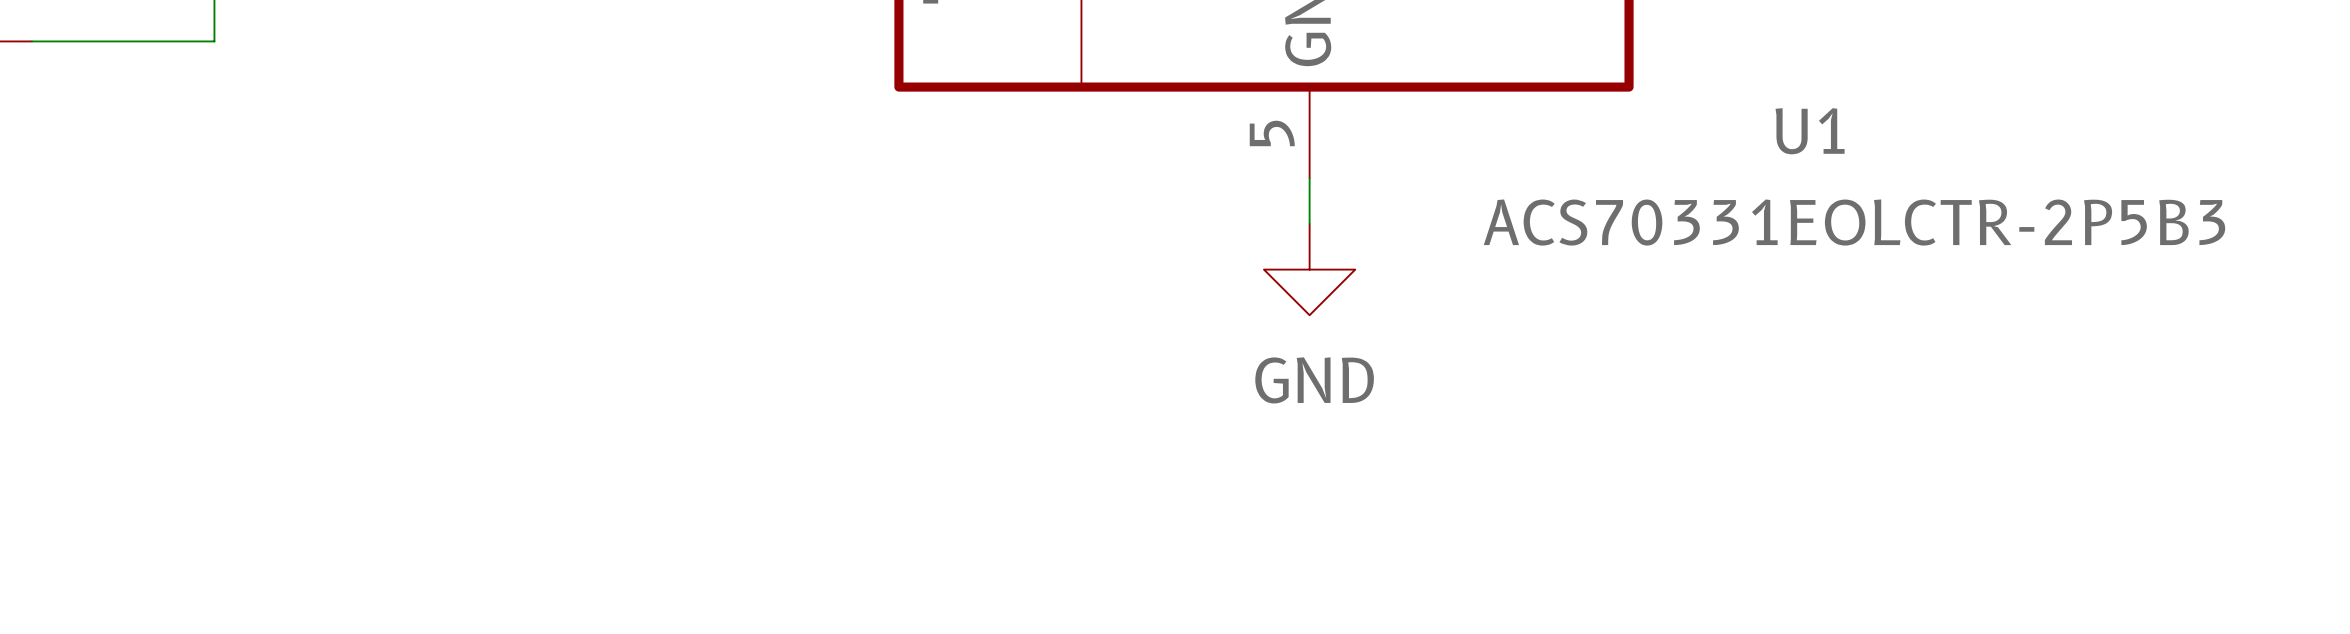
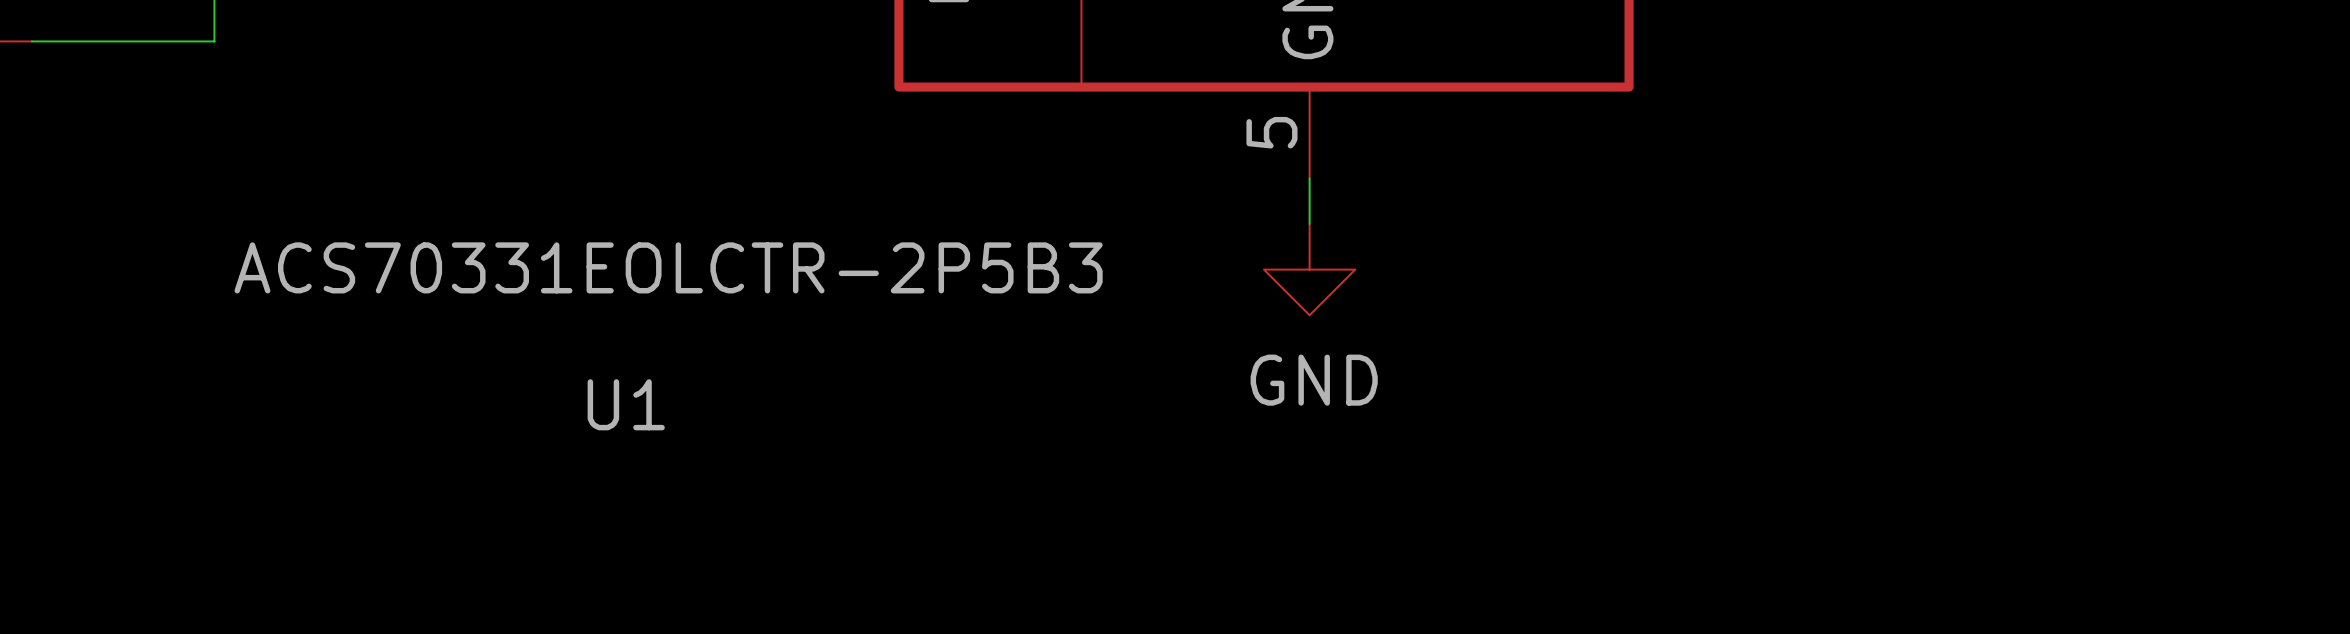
U1 name position: U1 (1810, 131) -> U1 (626, 404)
U1 value position: ACS70331EOLCTR-2P5B3 (1854, 222) -> ACS70331EOLCTR-2P5B3 (668, 267)

